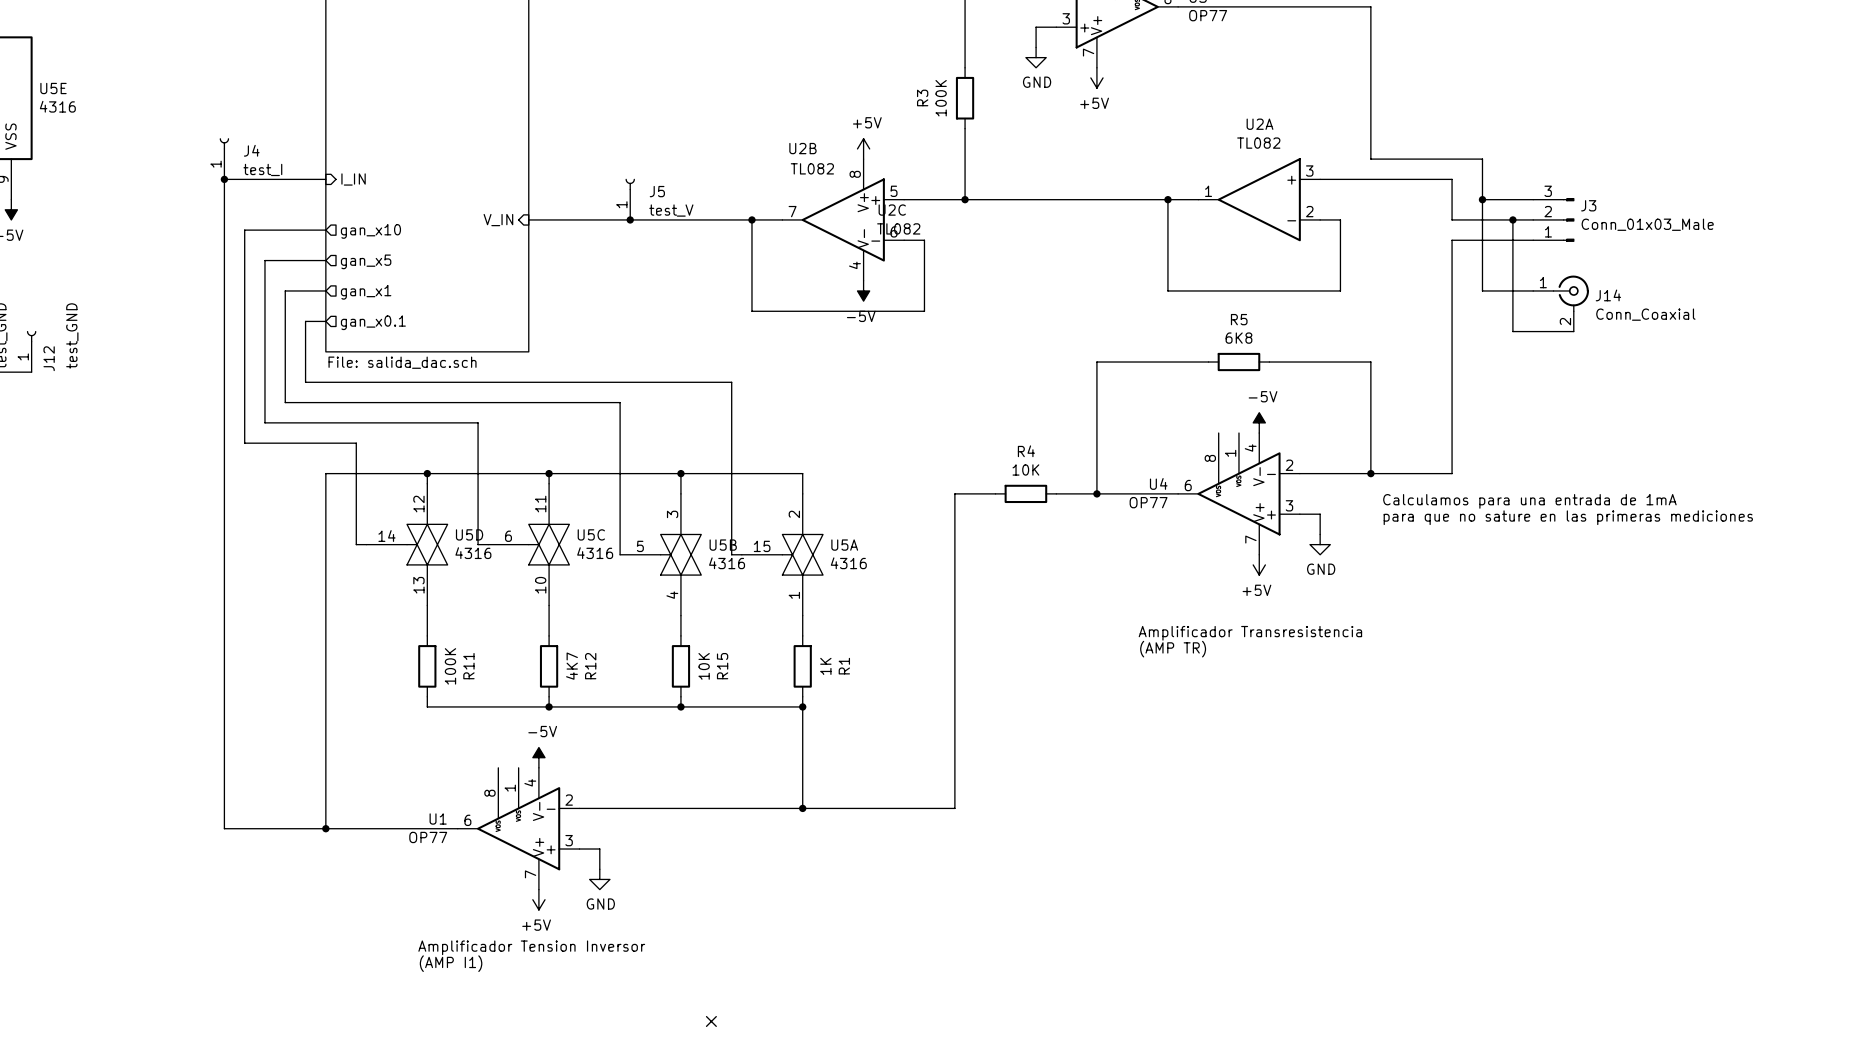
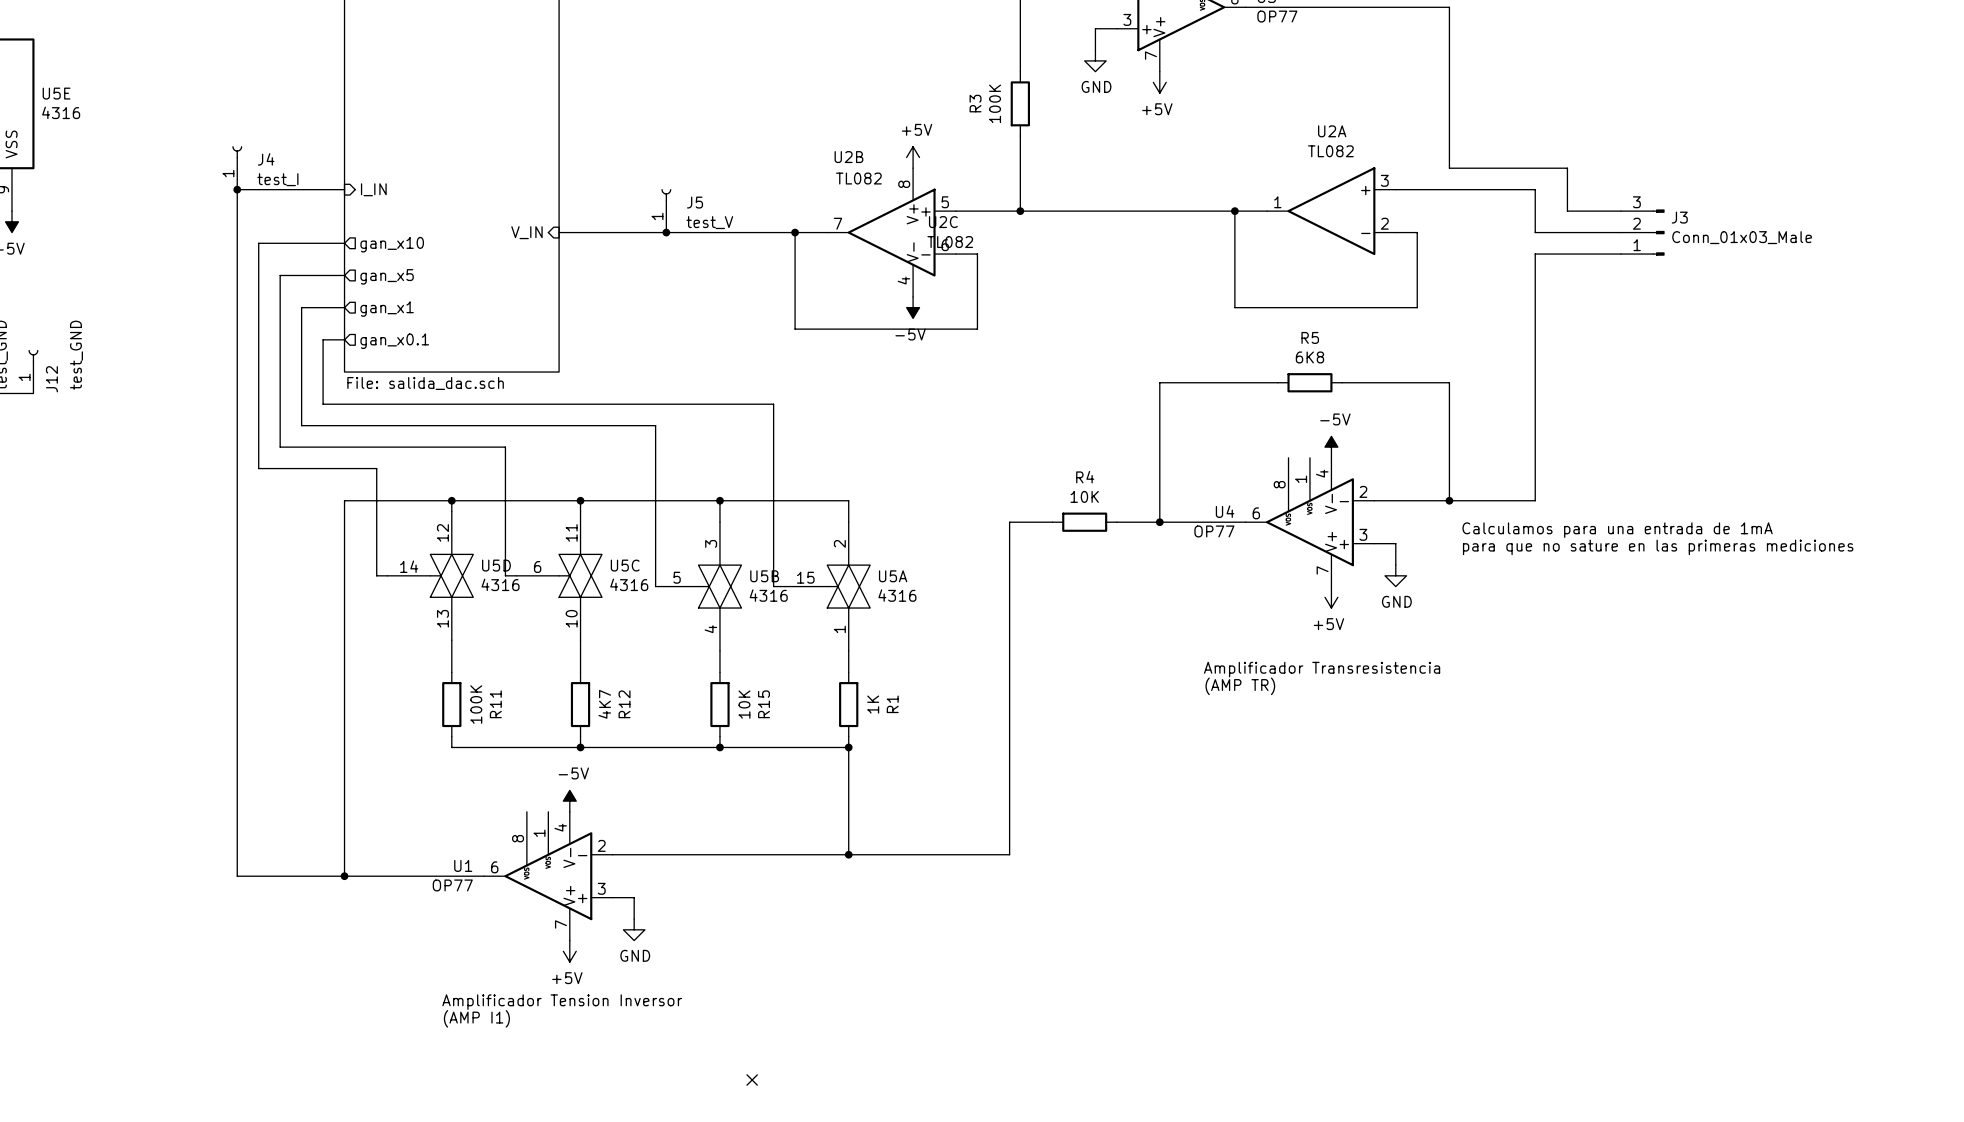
wire: (1482, 199) (1482, 290) (1533, 290) -> none
junction: (1482, 199) -> none
wire: (1512, 219) (1512, 331) (1573, 331) -> none
junction: (1512, 219) -> none
J14: Conn_Coaxial (1561, 303) -> none

